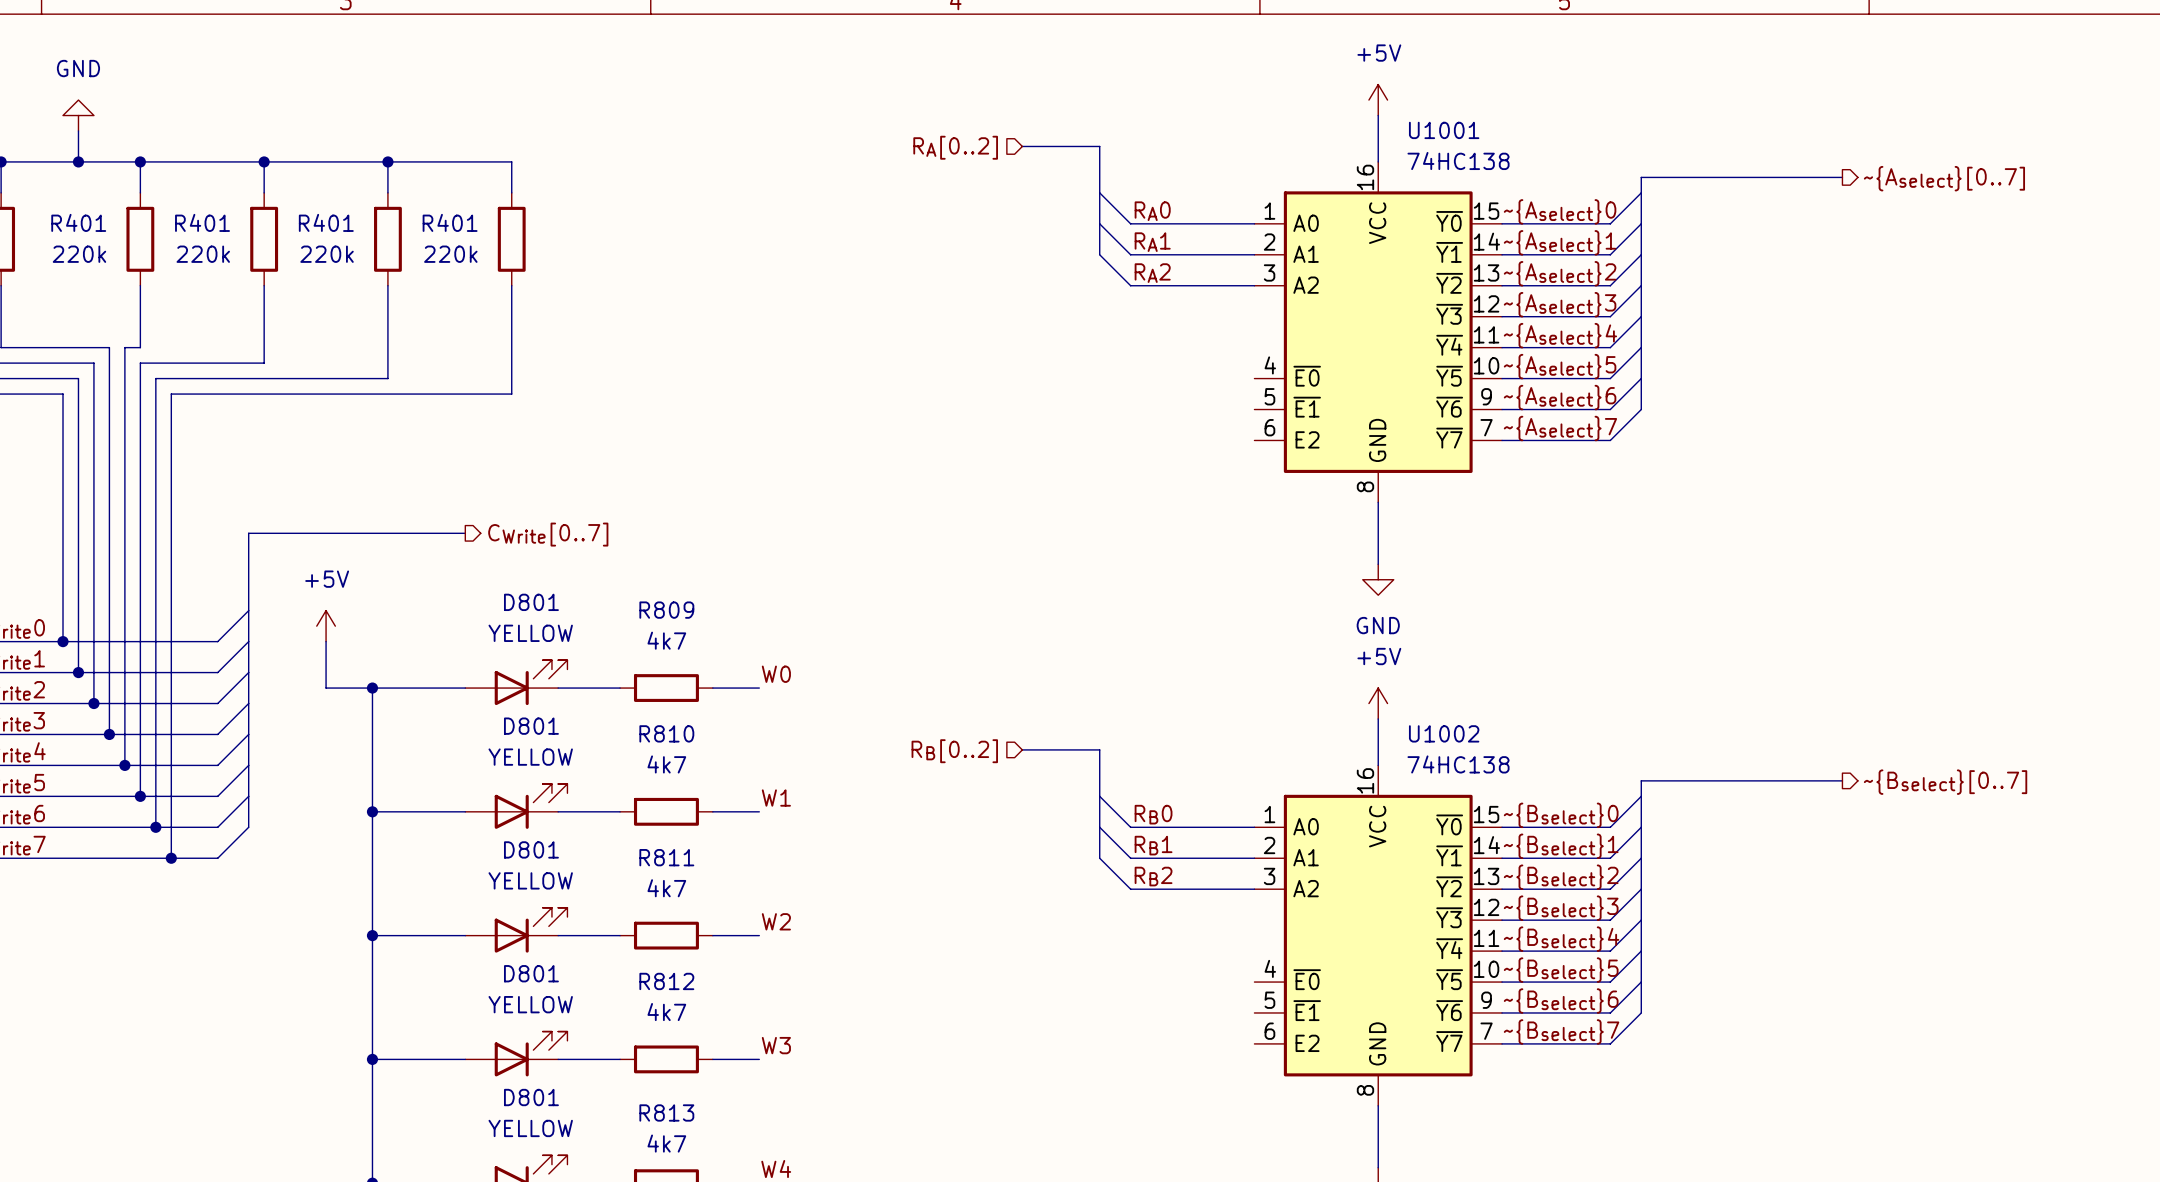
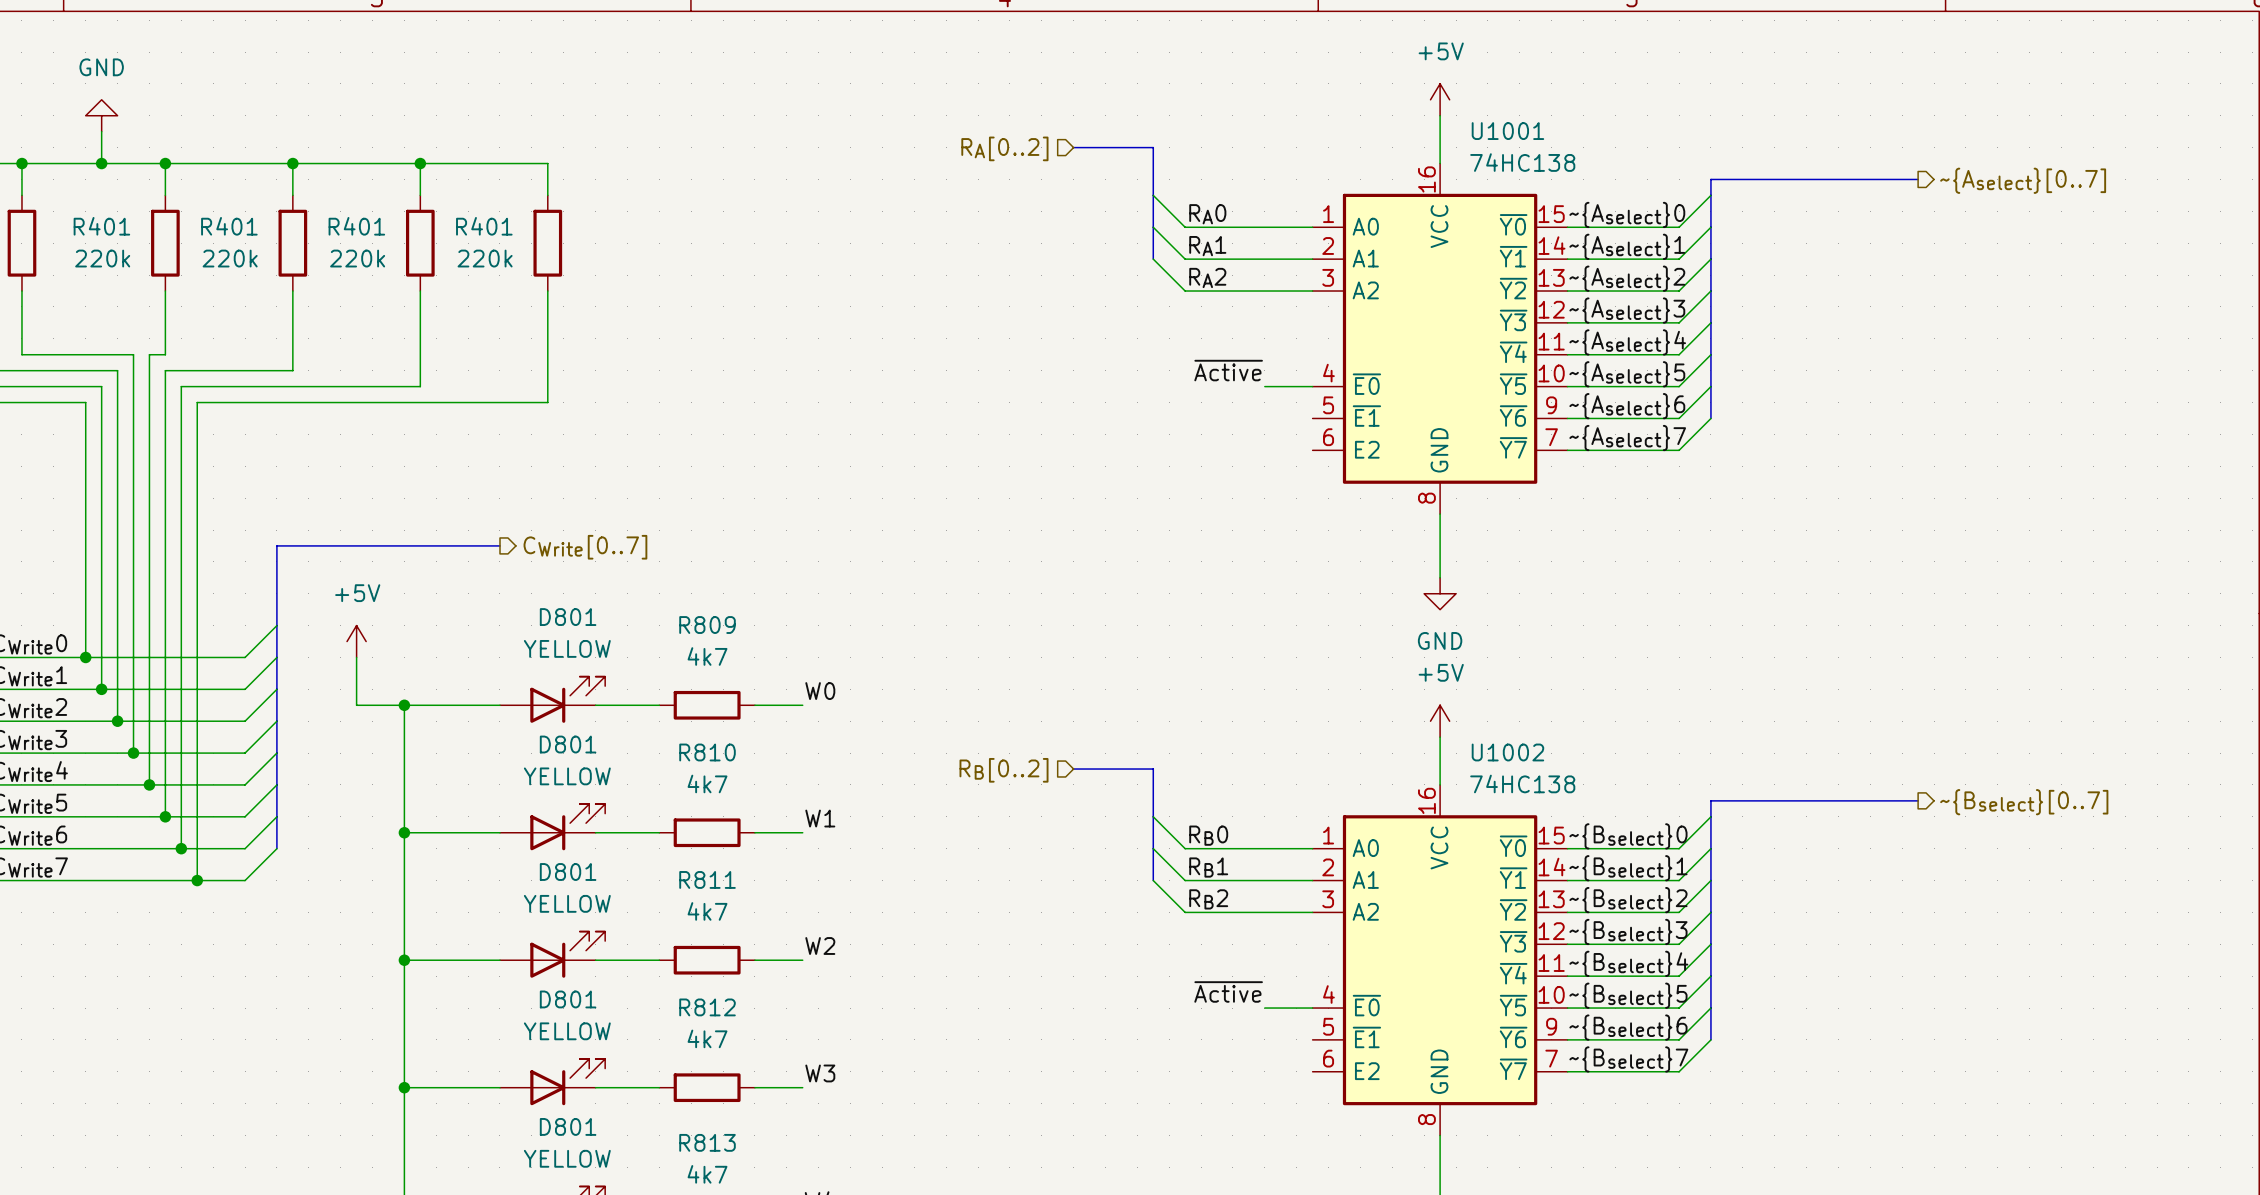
label: none -> ~{Active} (1228, 370)
wire: none -> (1264, 386) (1312, 386)
label: none -> ~{Active} (1228, 991)
wire: none -> (1264, 1008) (1312, 1008)

